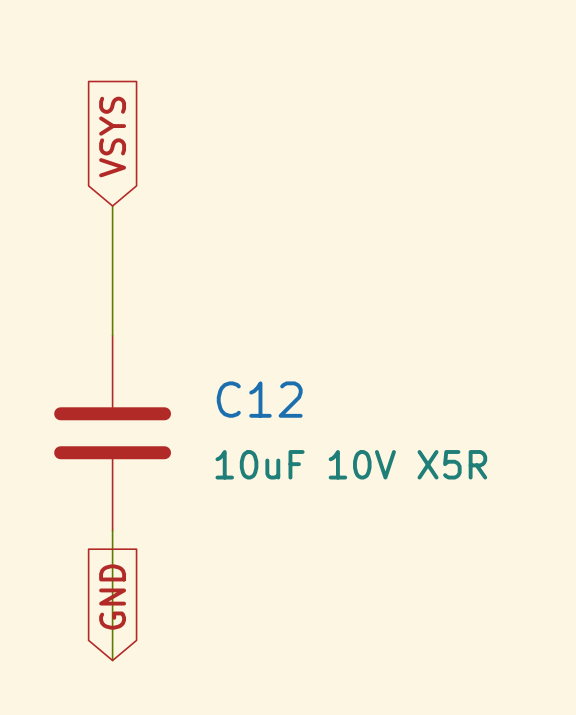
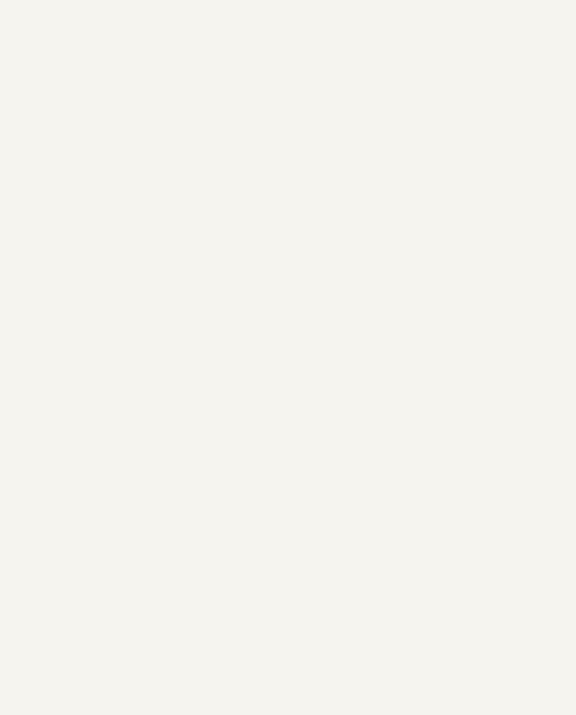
global label: VSYS (112, 137) -> none
wire: (112, 206) (112, 335) -> none
C12: 10uF 10V X5R (112, 433) -> none
wire: (112, 530) (112, 660) -> none
global label: GND (112, 597) -> none

